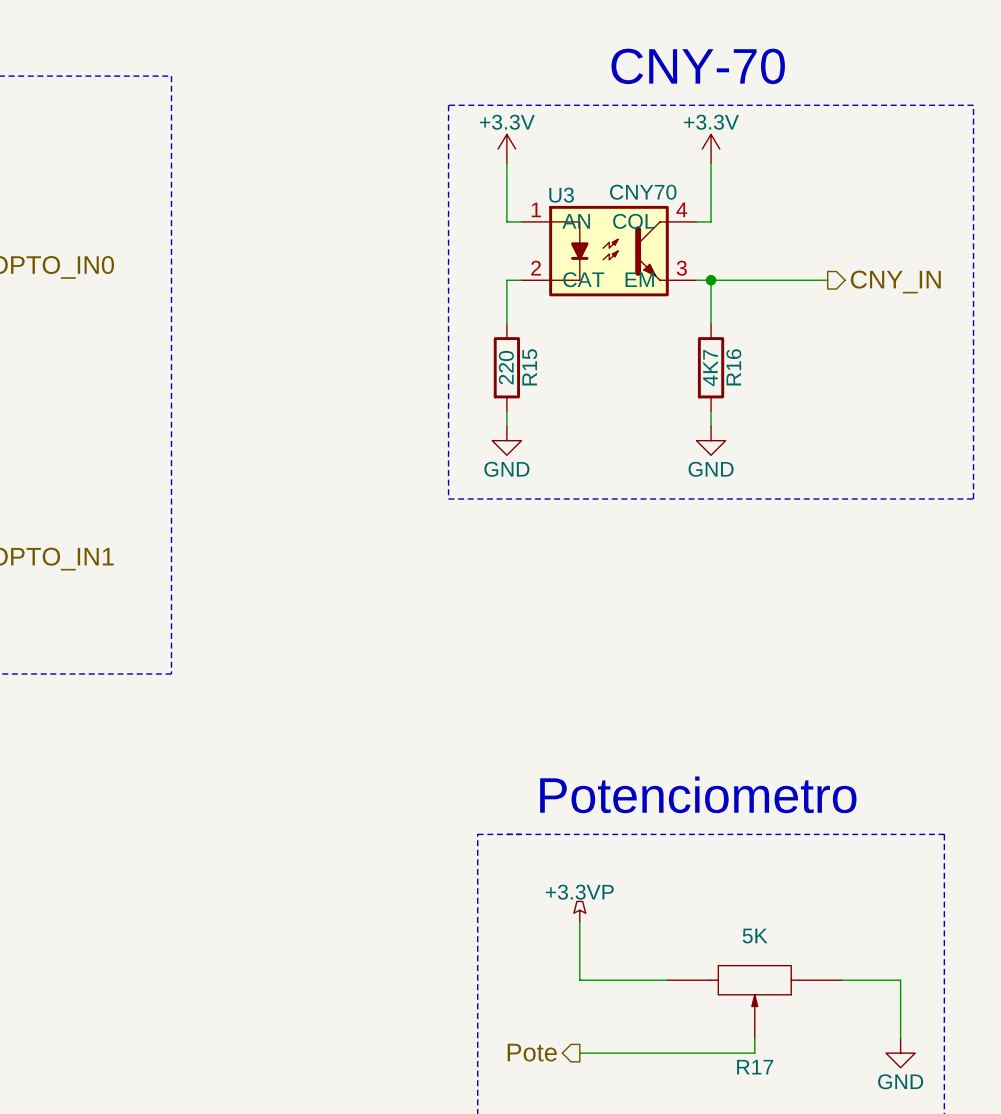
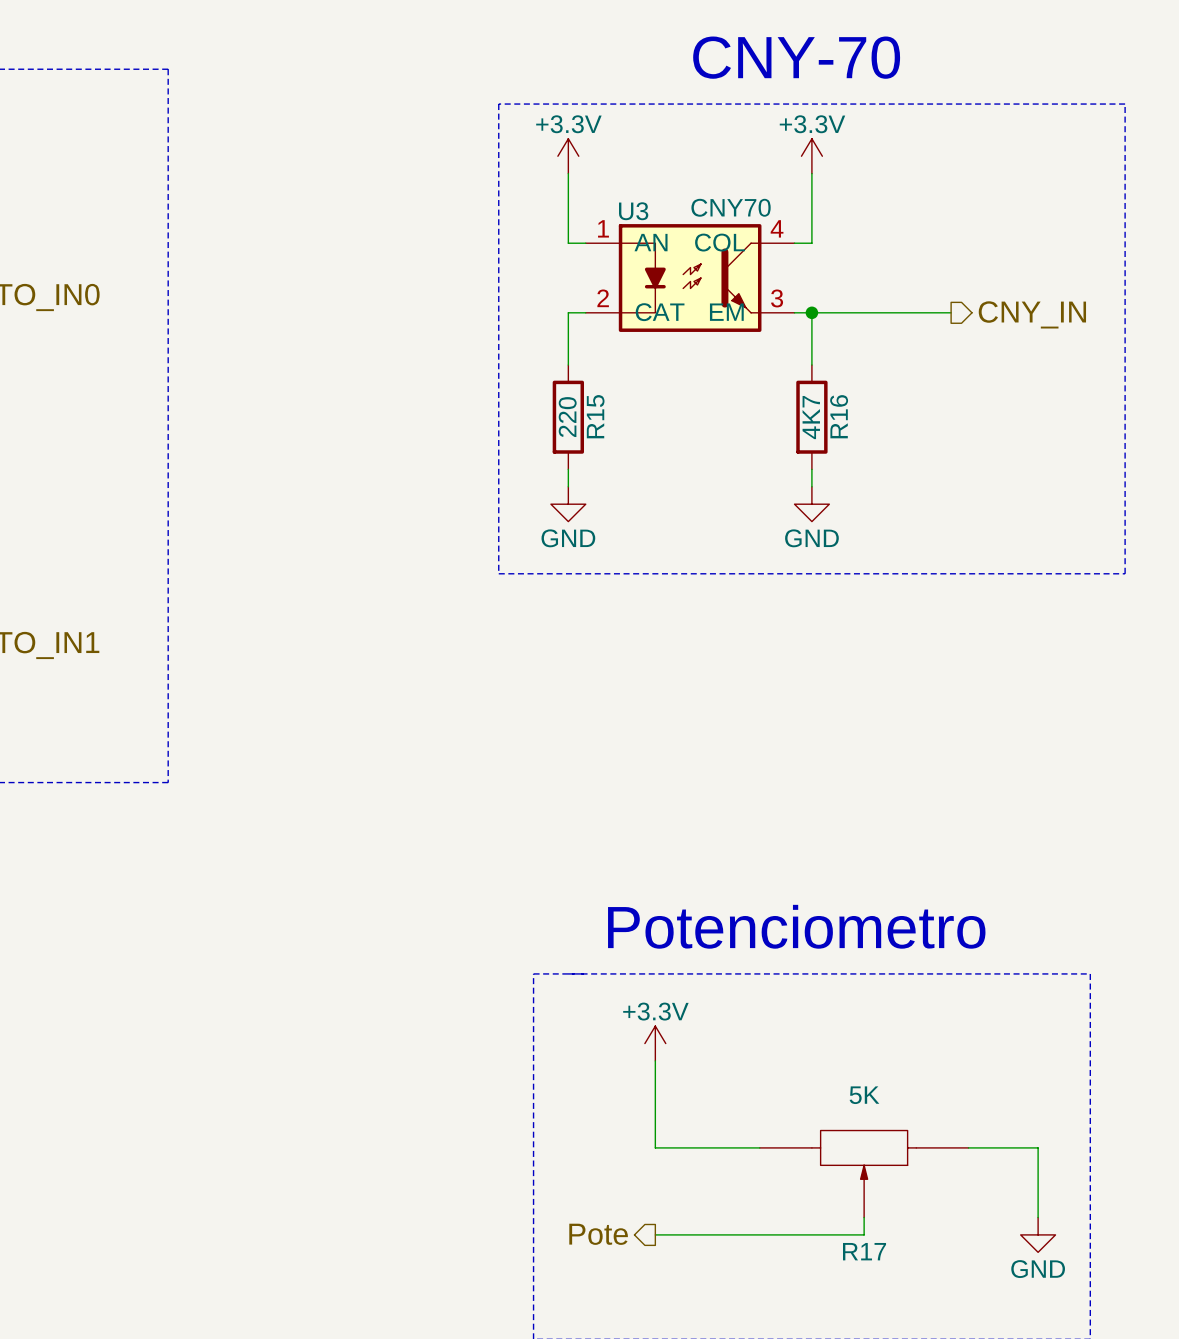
power symbol: none -> +3.3V (655, 1043)
power symbol: +3.3VP (579, 911) -> none

